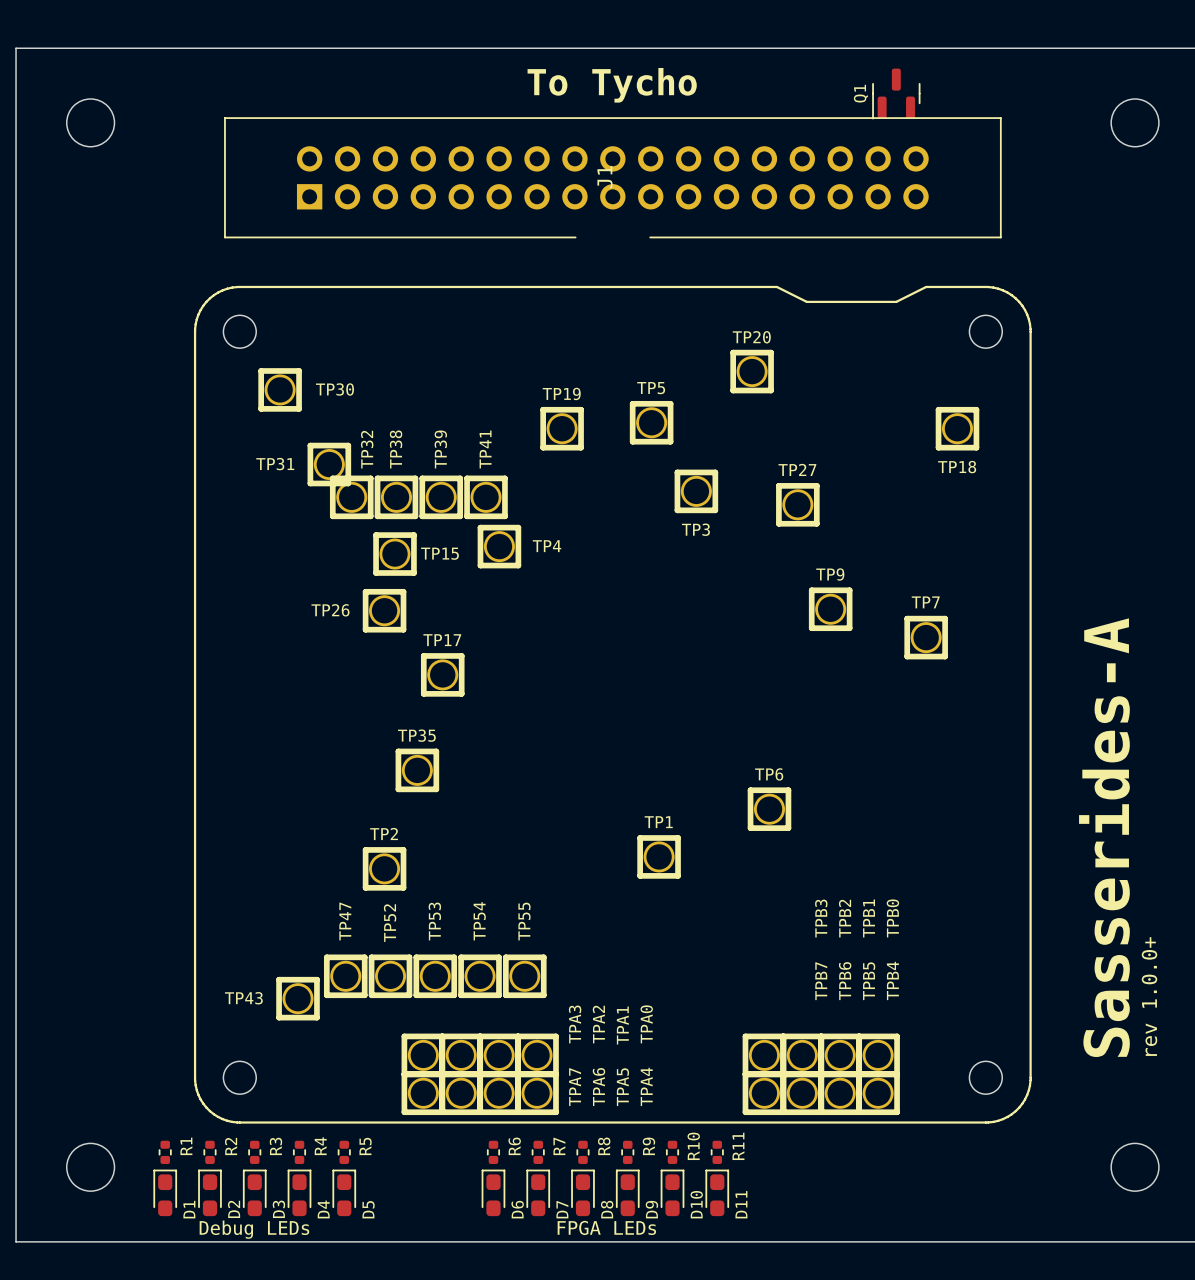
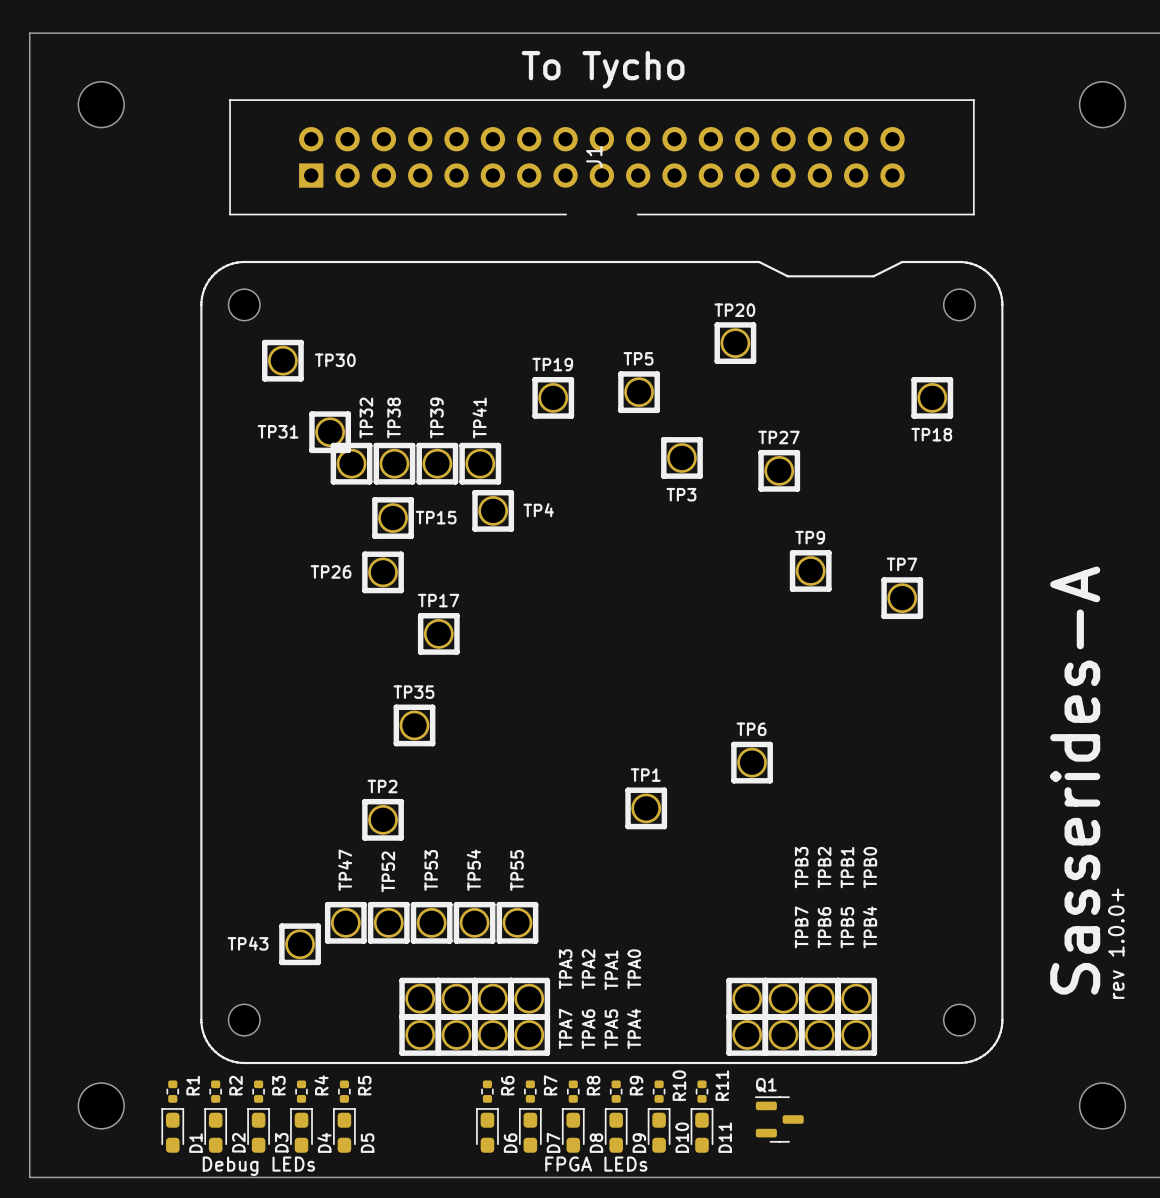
Q1 rotation: 0° (896, 94) -> 90° clockwise (779, 1119)
Q1 position: (896, 94) -> (779, 1119)

